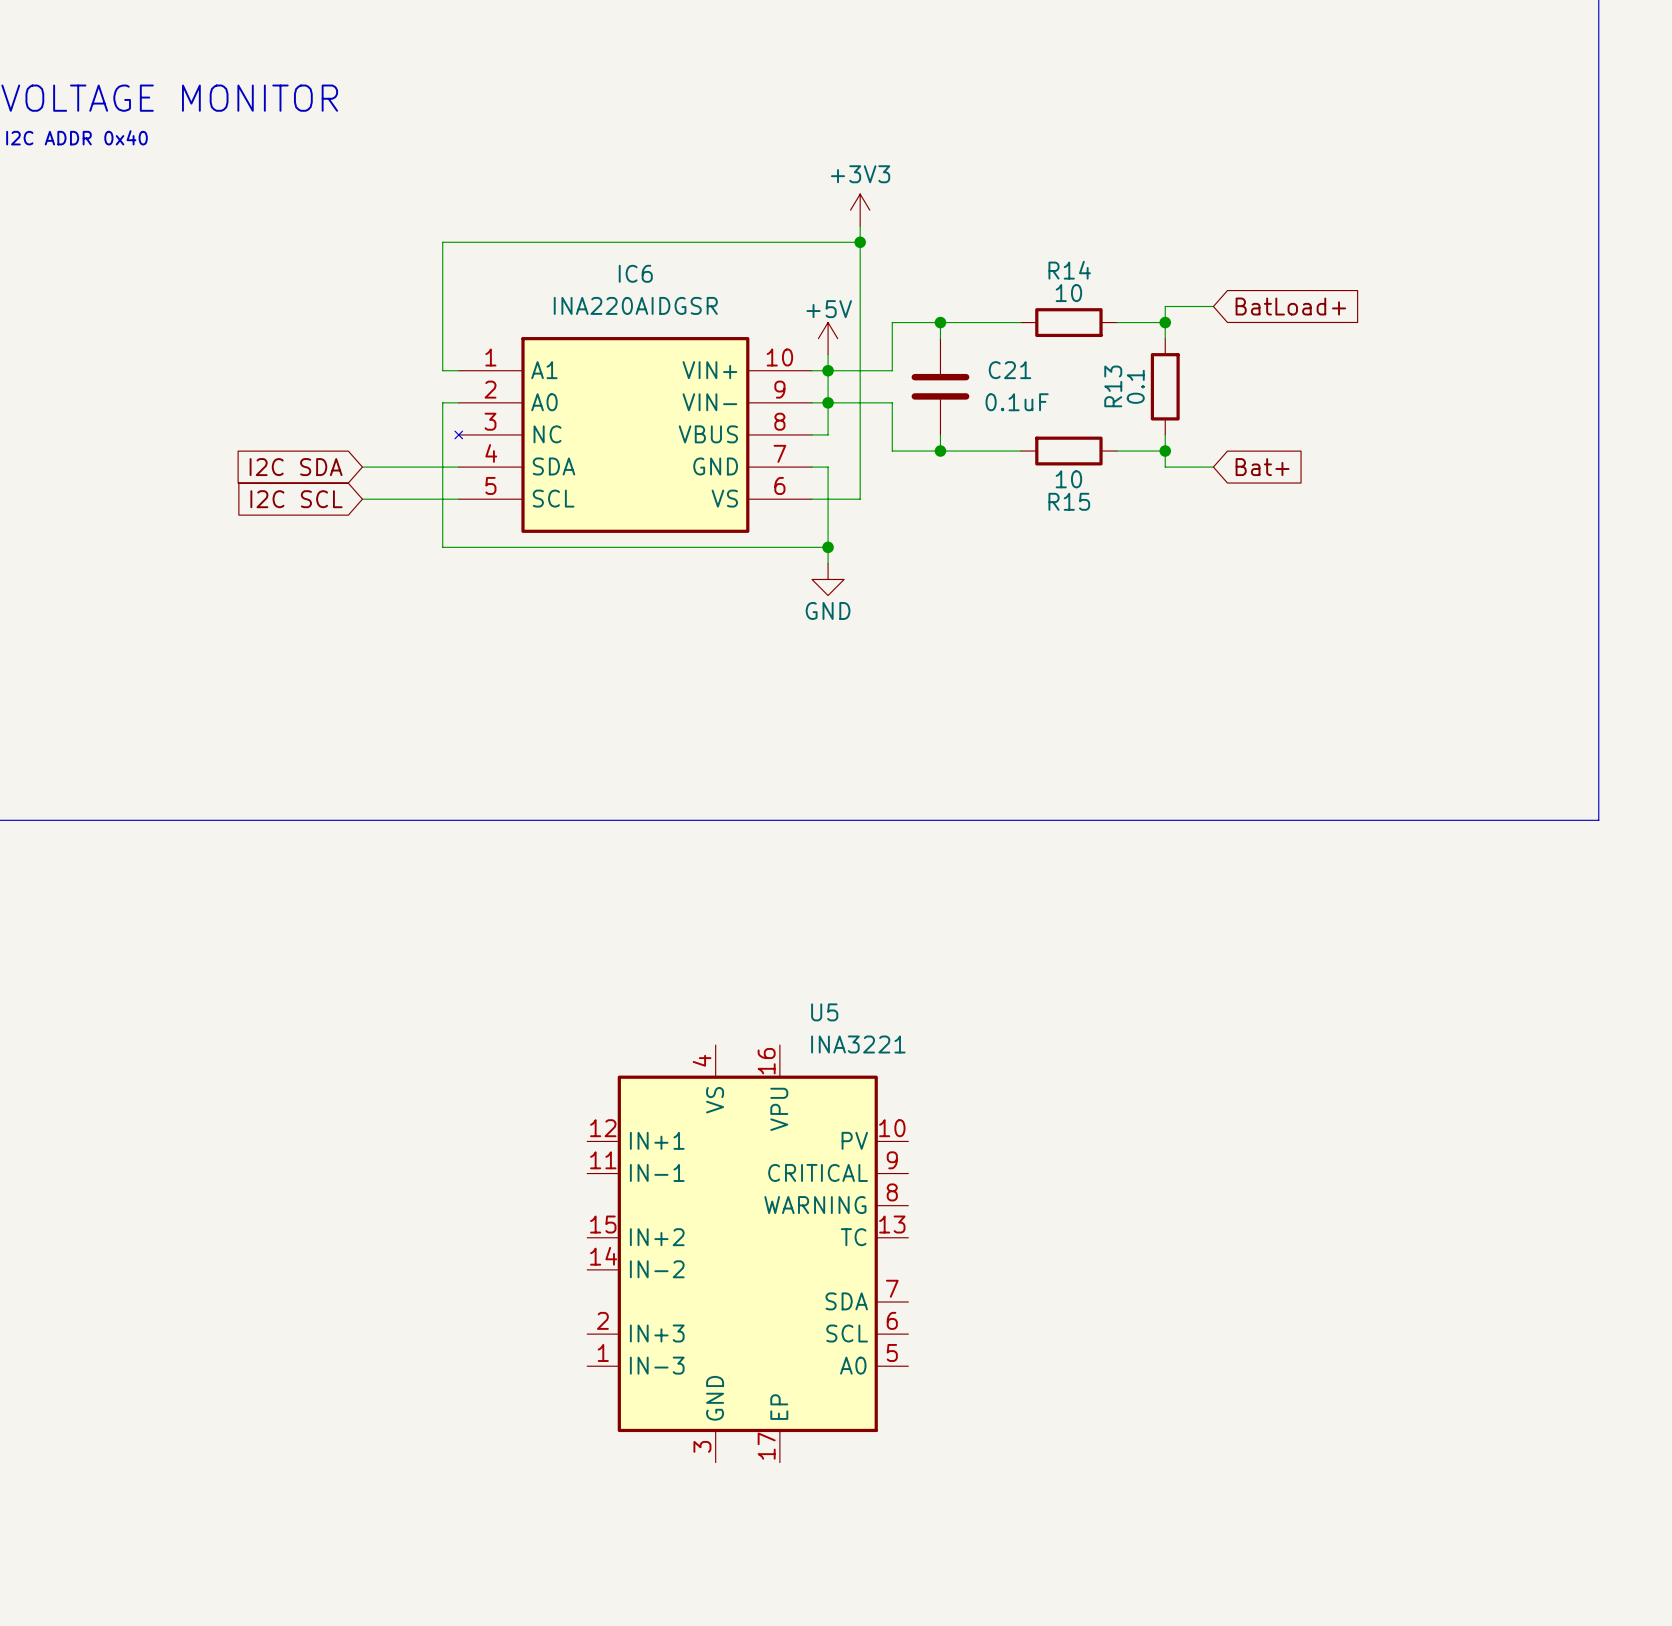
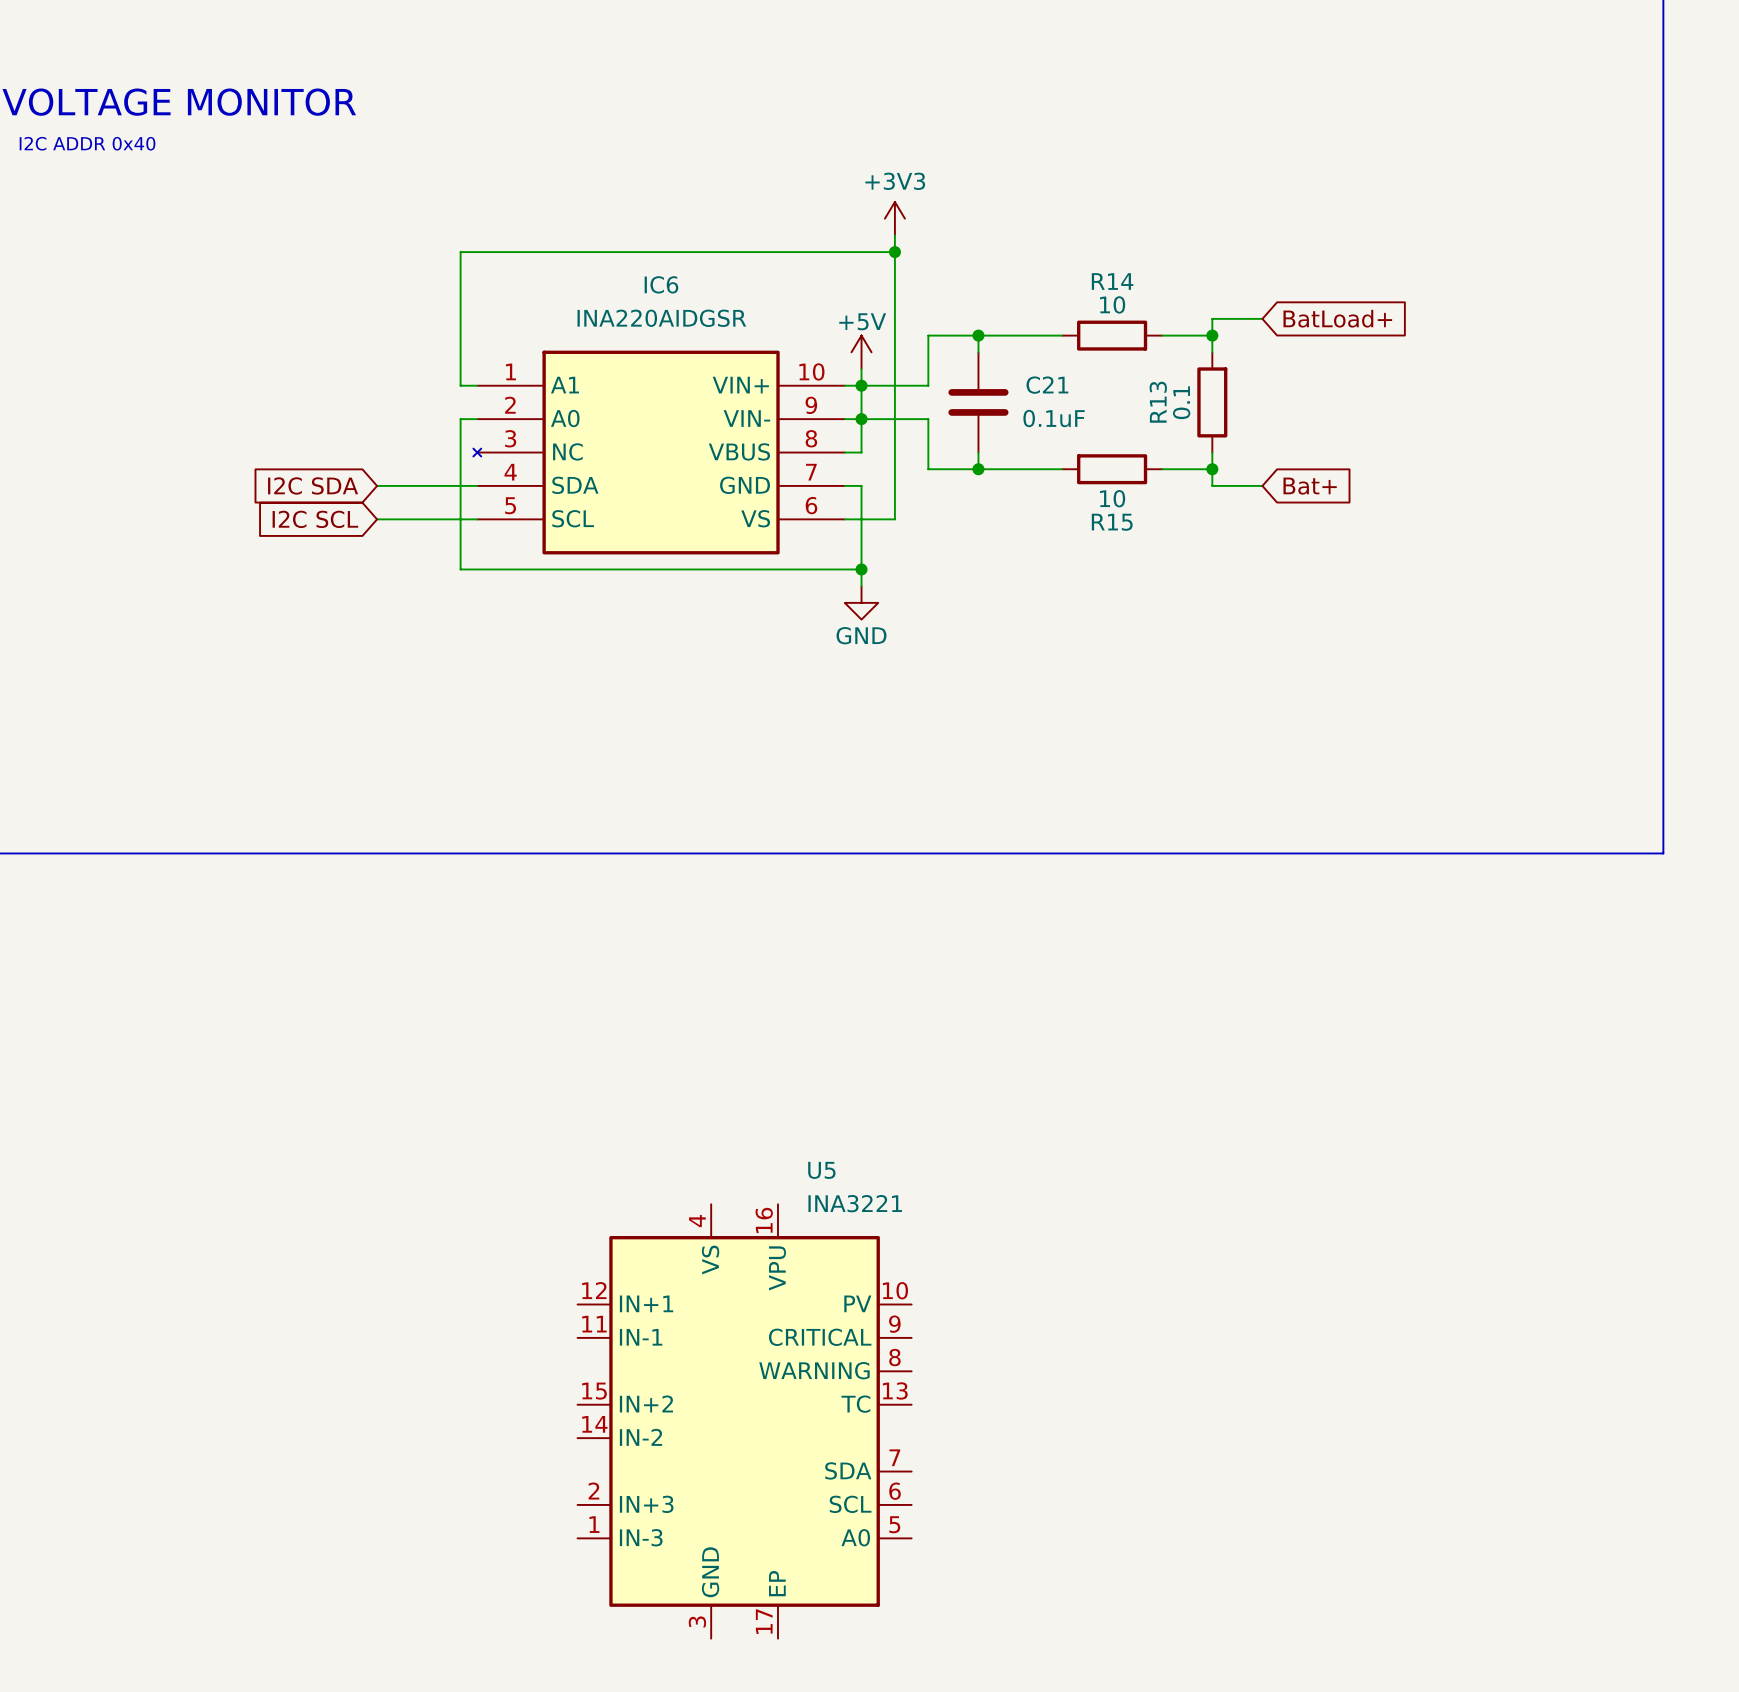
U5 position: (747, 1253) -> (744, 1421)

